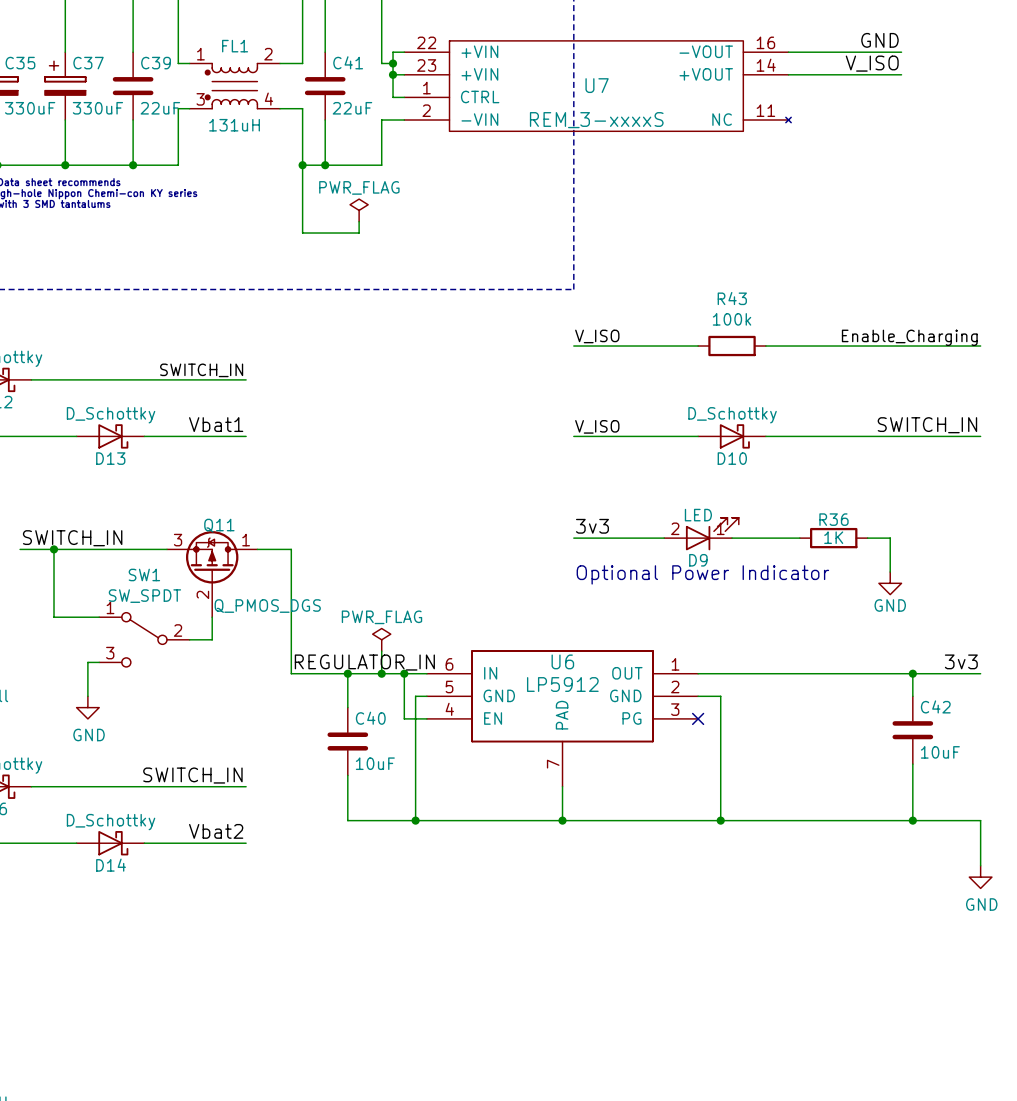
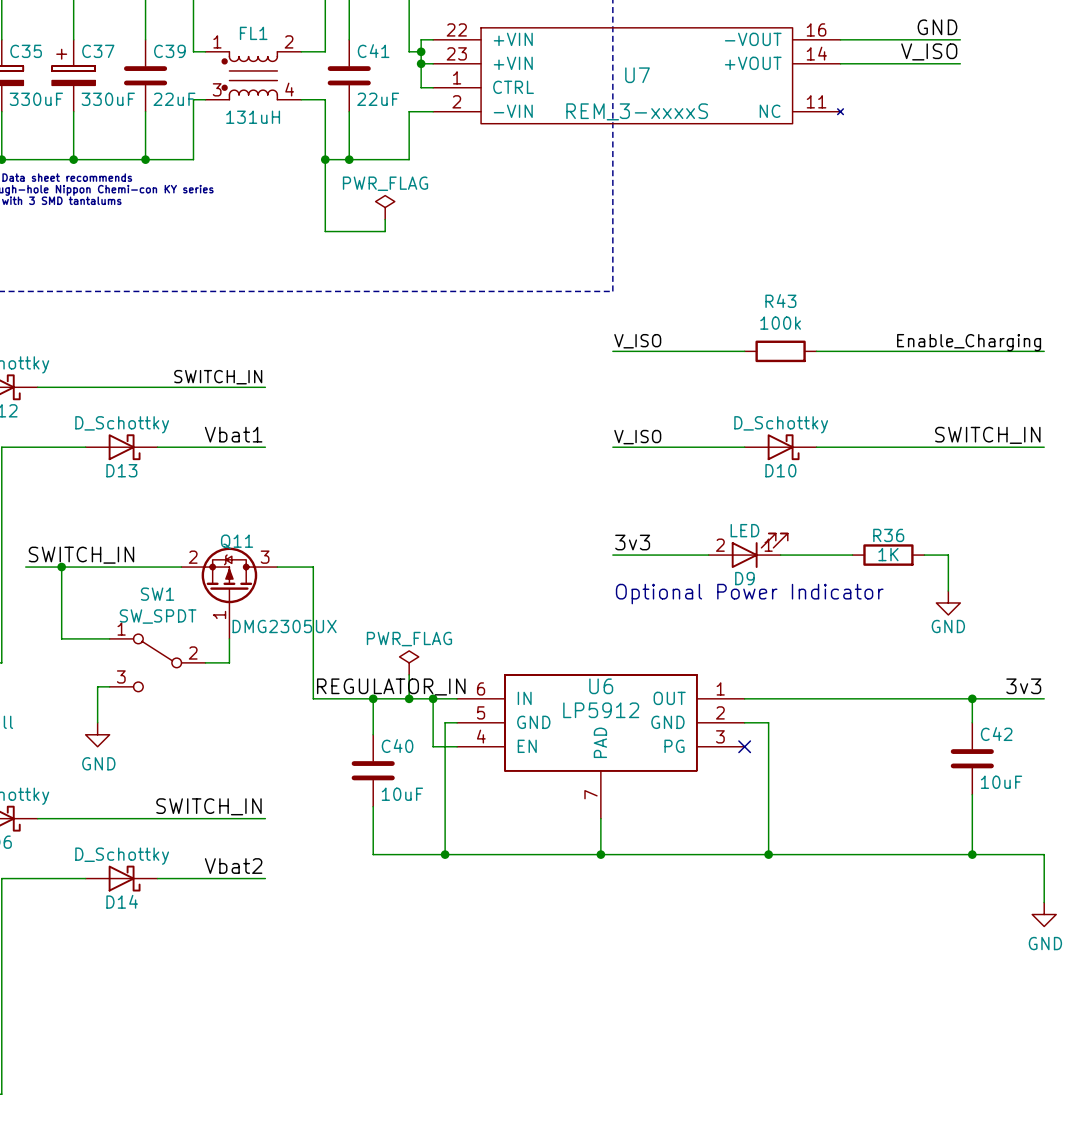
Q11 pin number: 3 (178, 540) -> 2 (193, 557)
Q11 pin number: 1 (246, 540) -> 3 (265, 557)
Q11 pin number: 2 (202, 594) -> 1 (219, 614)
Q11 value: Q_PMOS_DGS (267, 606) -> DMG2305UX (284, 626)

